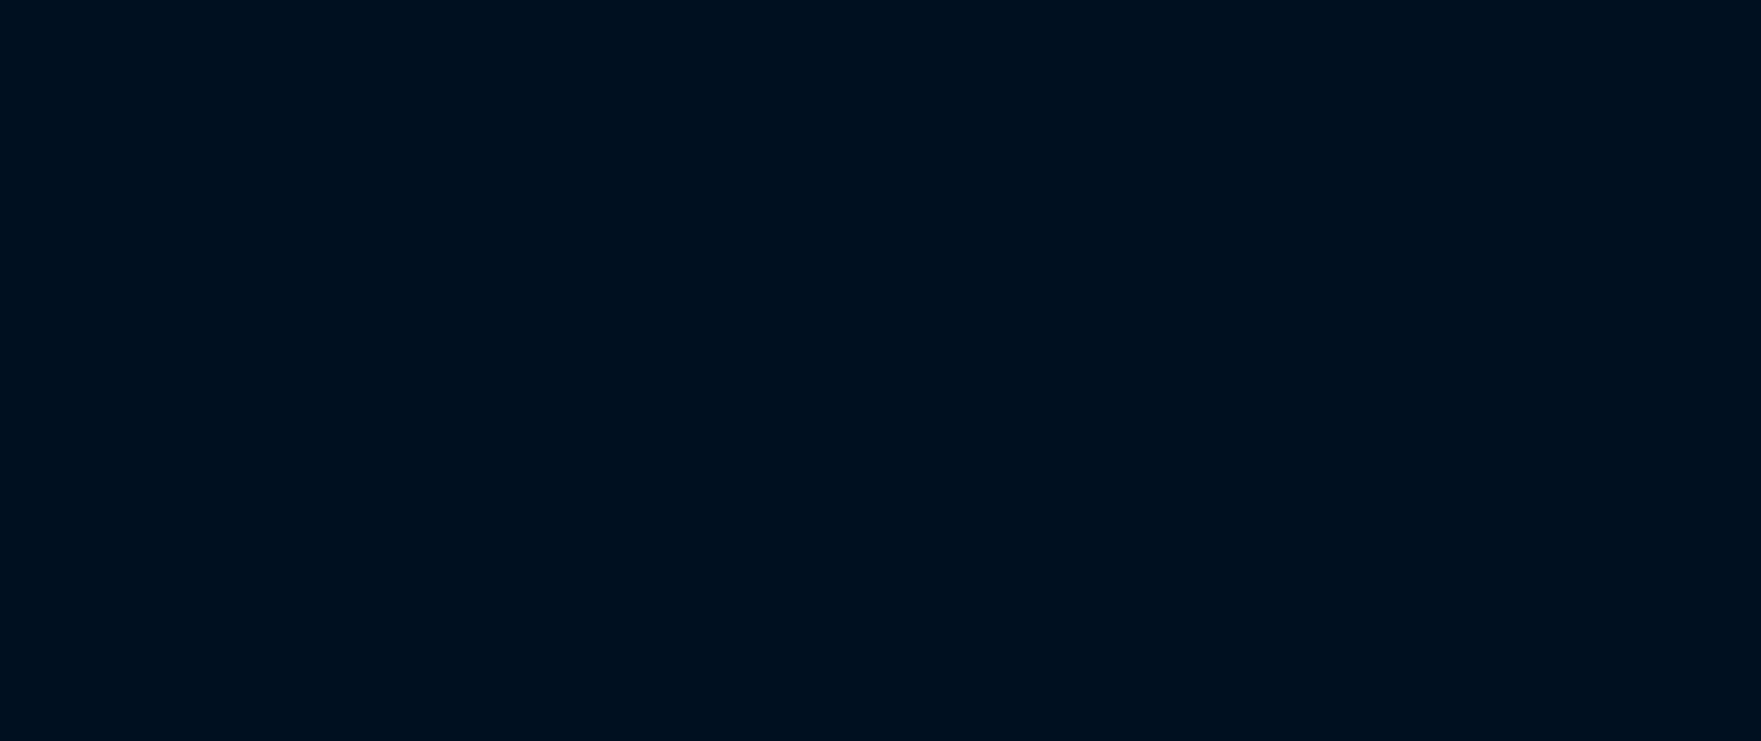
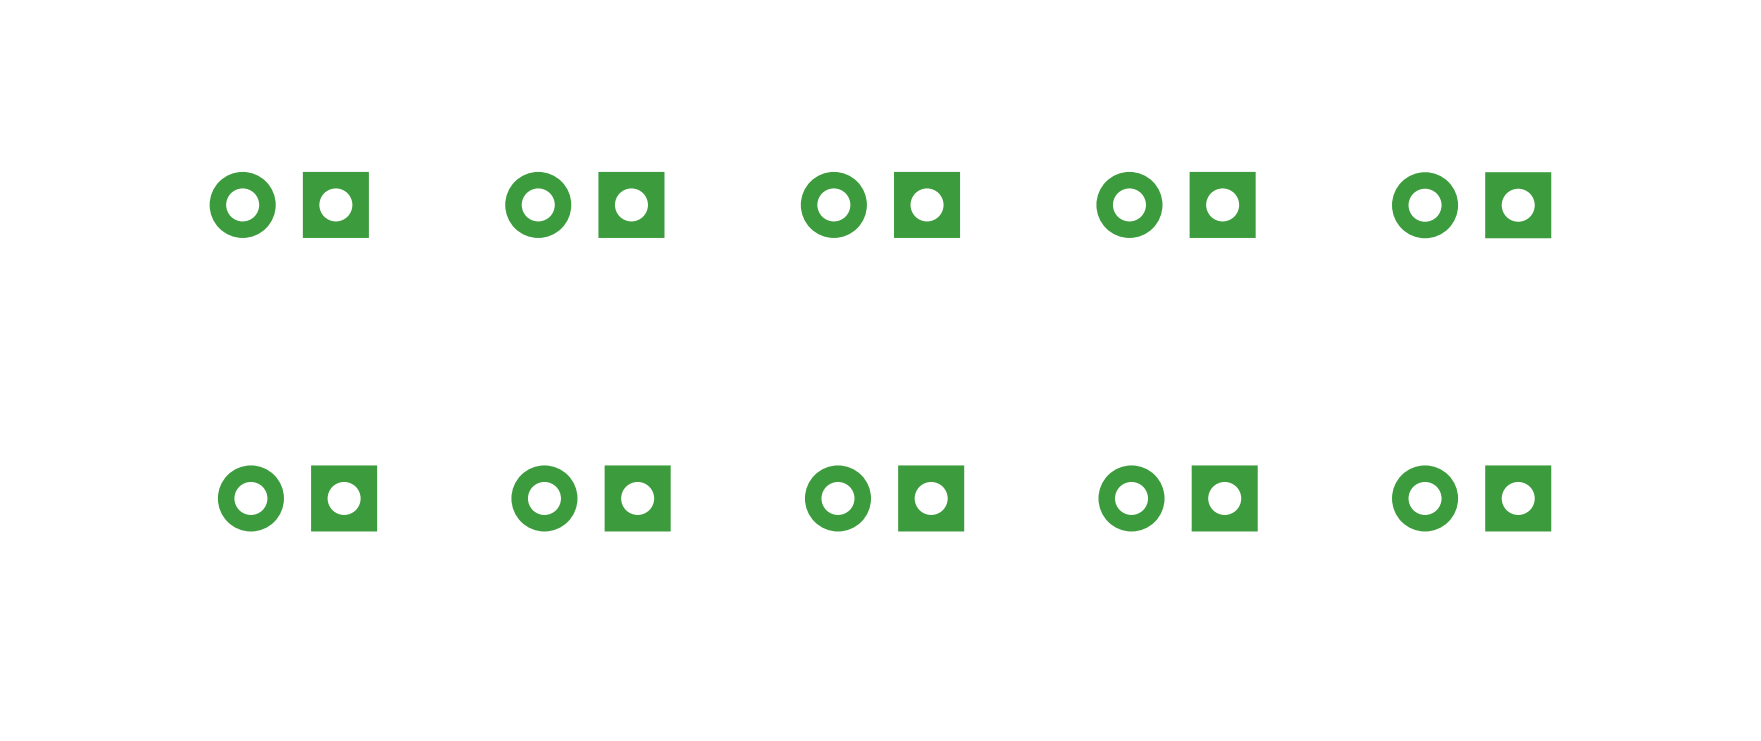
part: none -> (289, 204)
part: none -> (584, 204)
part: none -> (880, 204)
part: none -> (1176, 204)
part: none -> (1471, 205)
part: none -> (297, 498)
part: none -> (591, 498)
part: none -> (884, 498)
part: none -> (1178, 498)
part: none -> (1471, 498)

